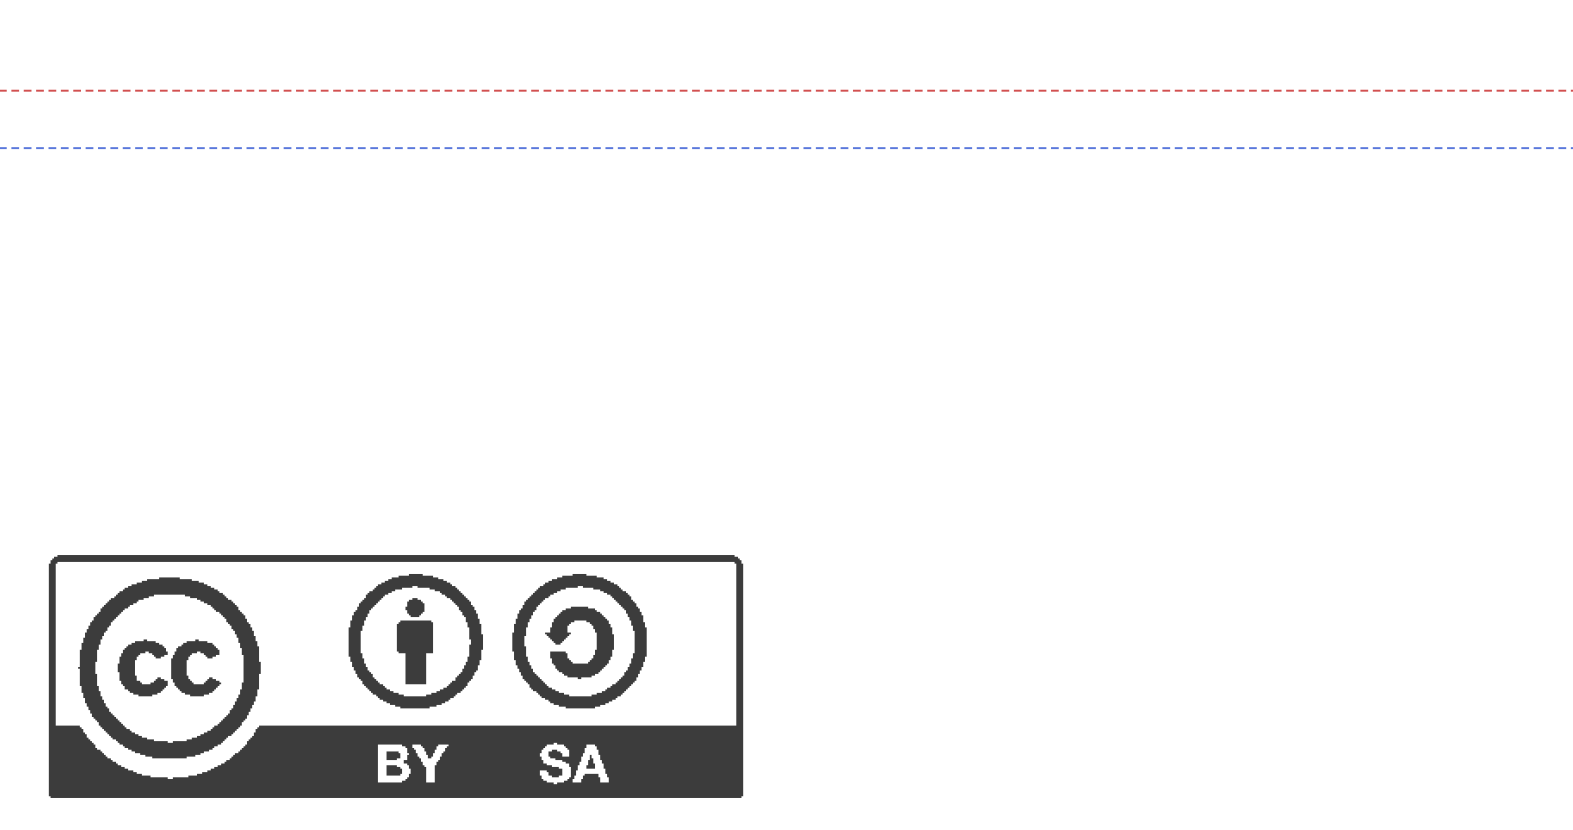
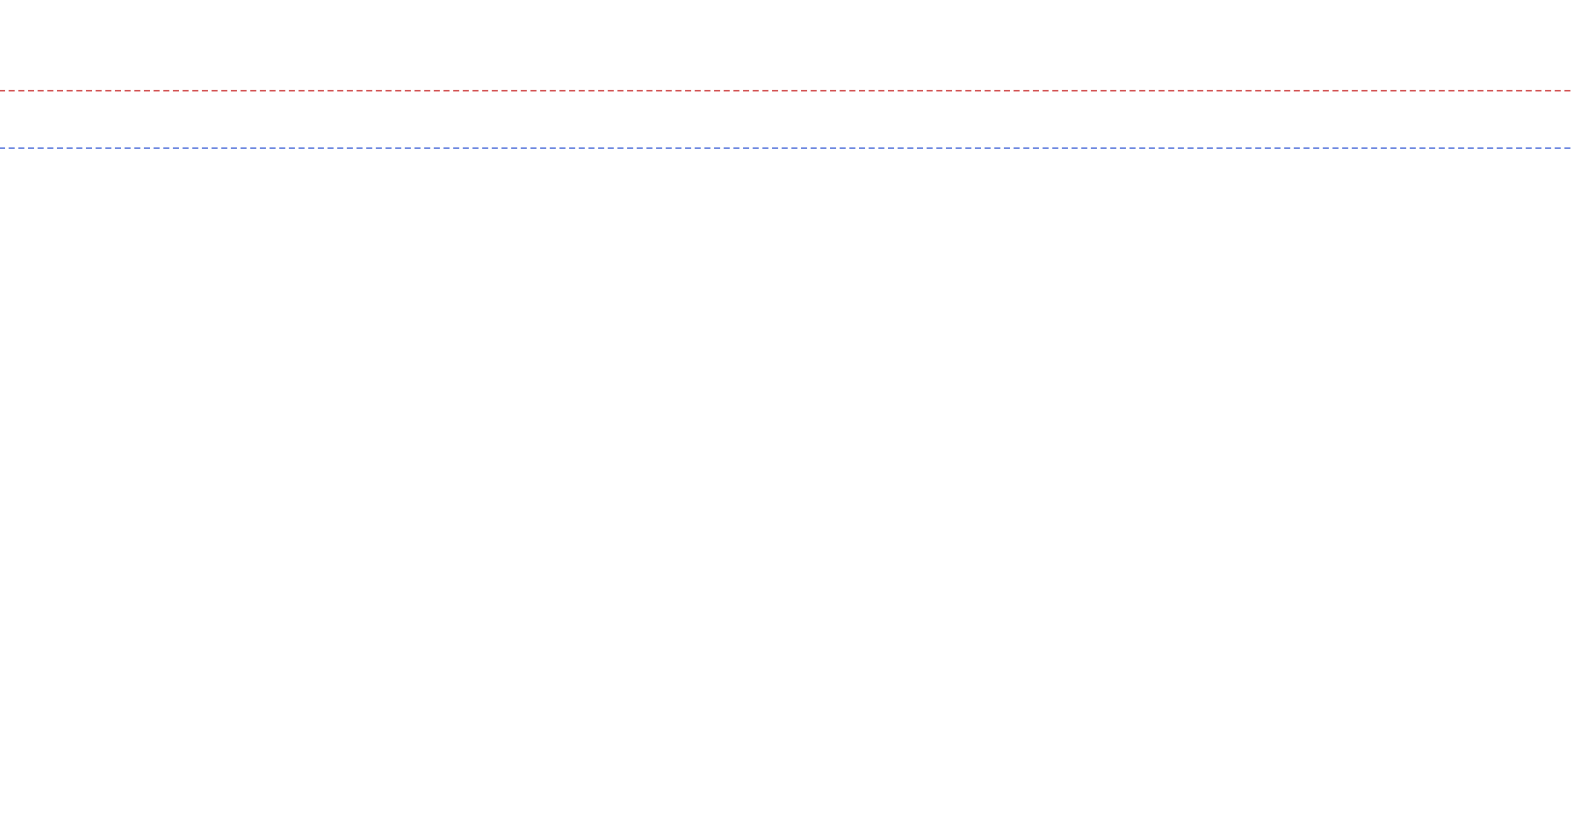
drawing: [48, 555, 744, 798] -> none

